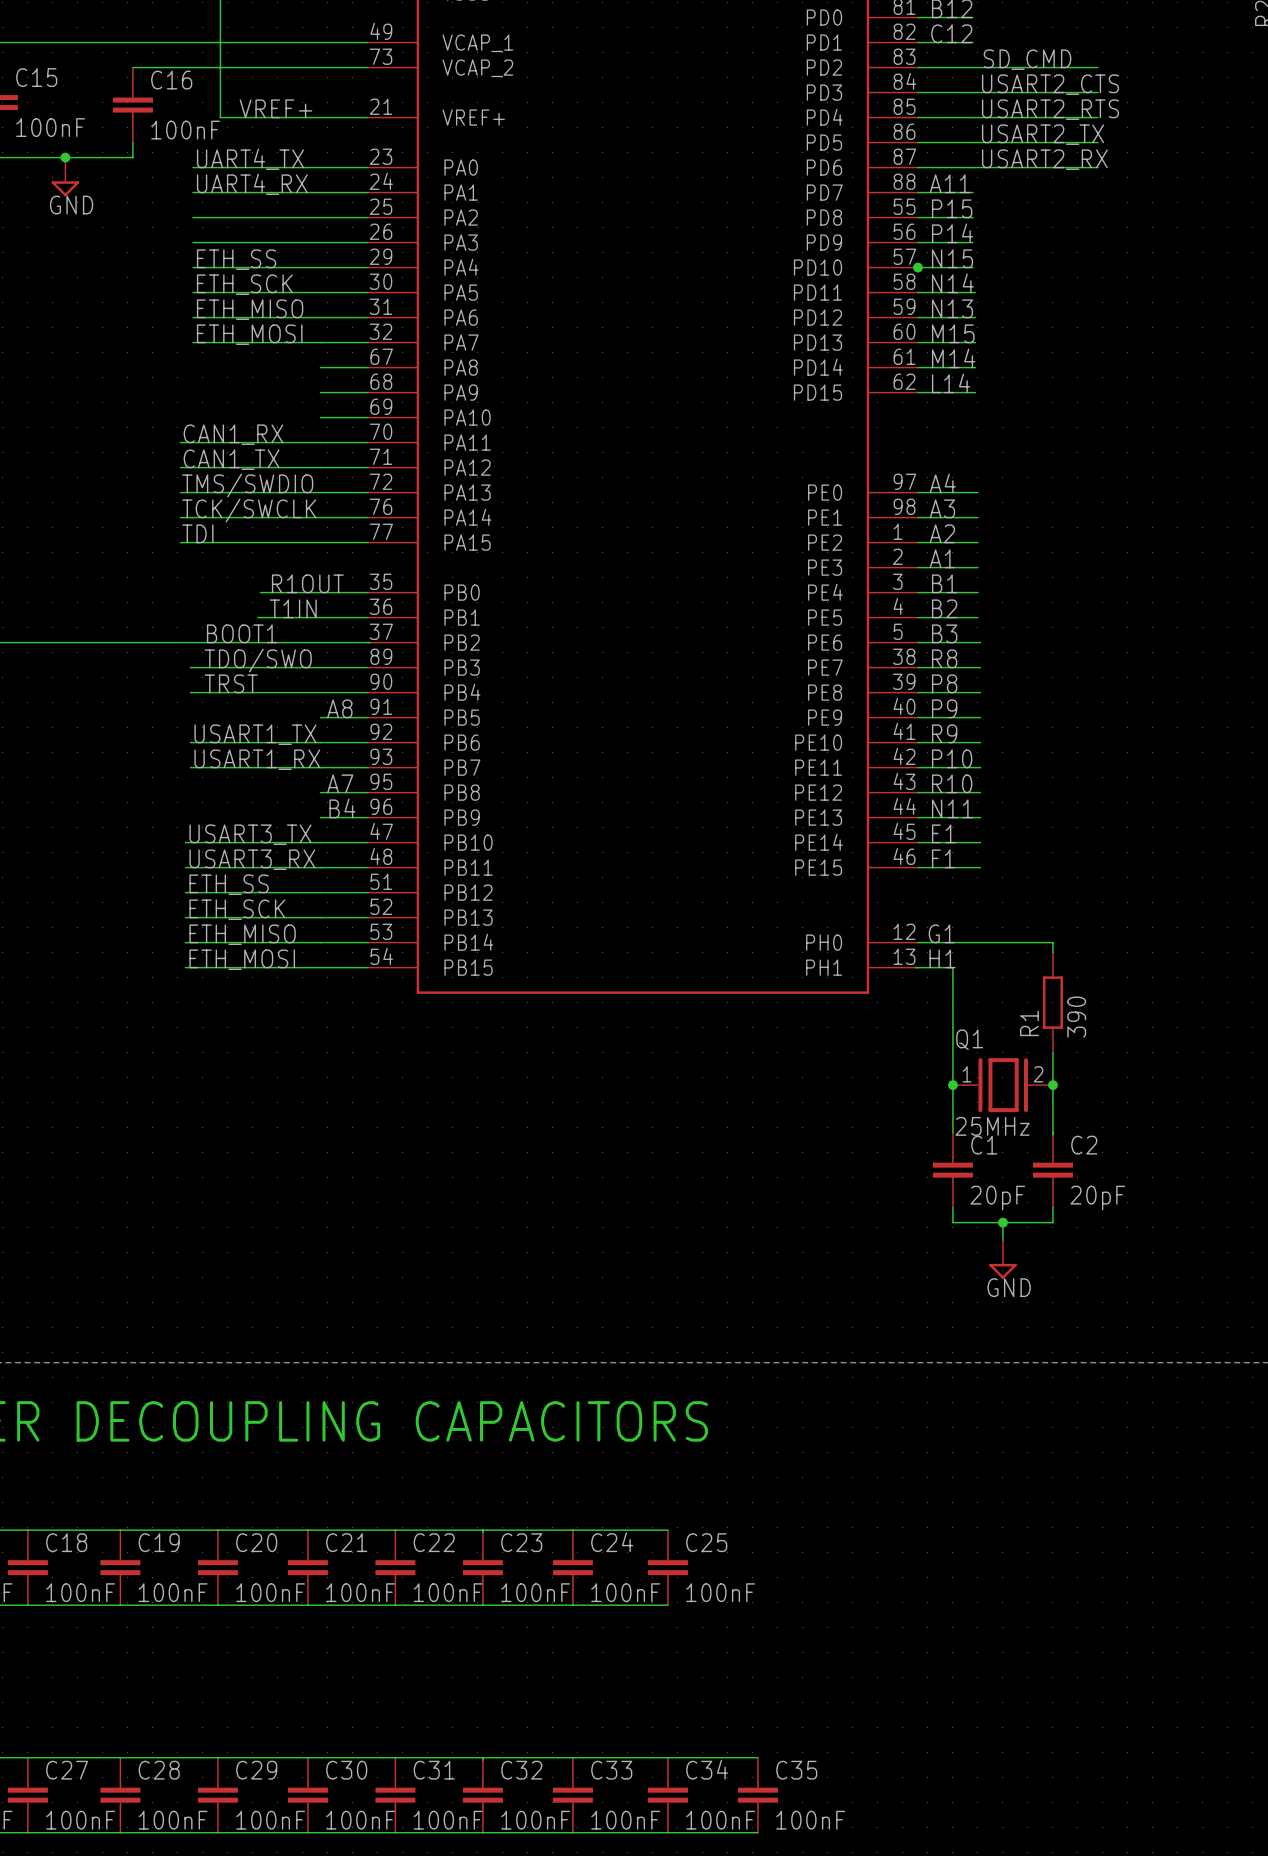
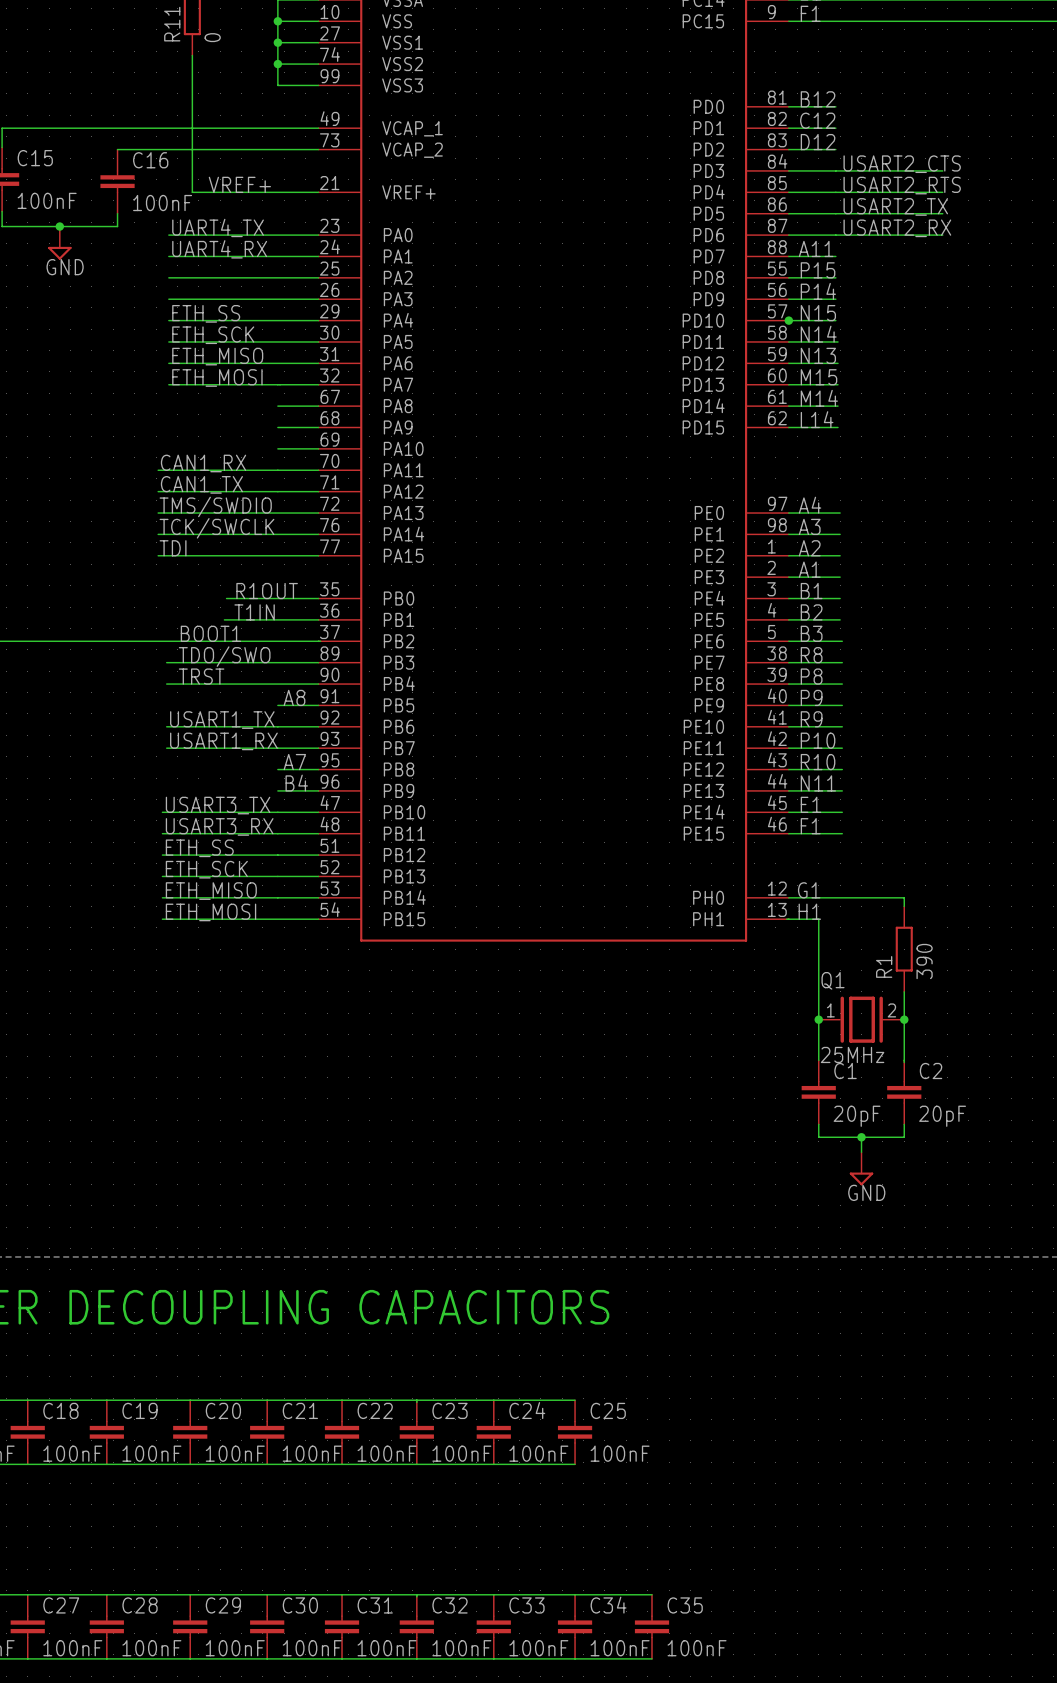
label: none -> D12 (818, 142)
label: SD_CMD (1027, 59) -> none
wire: (972, 67) (1097, 67) -> none

